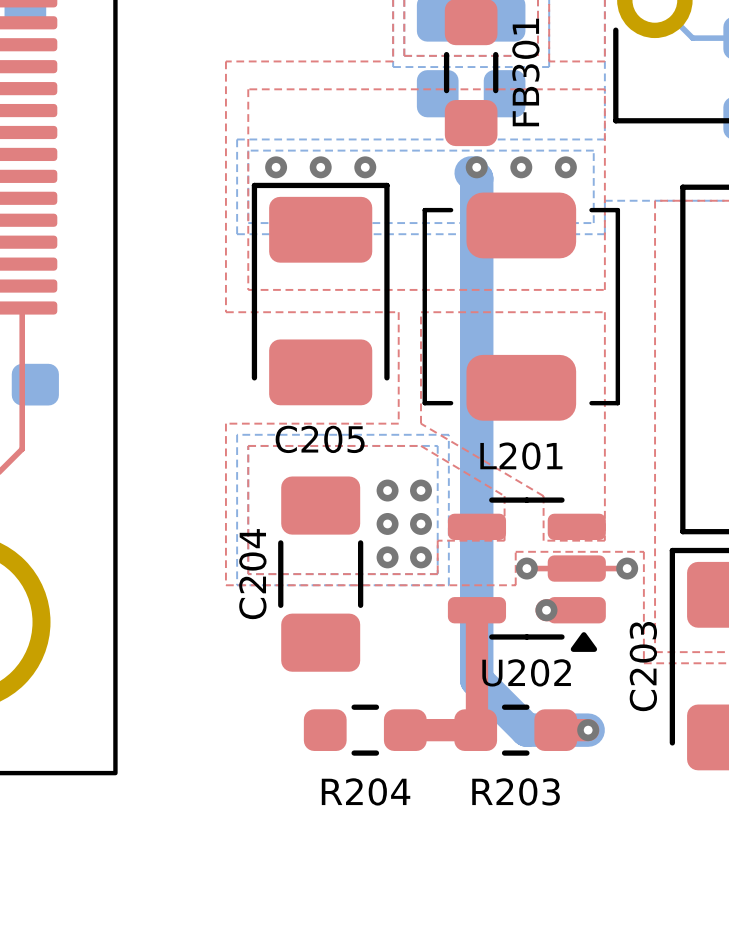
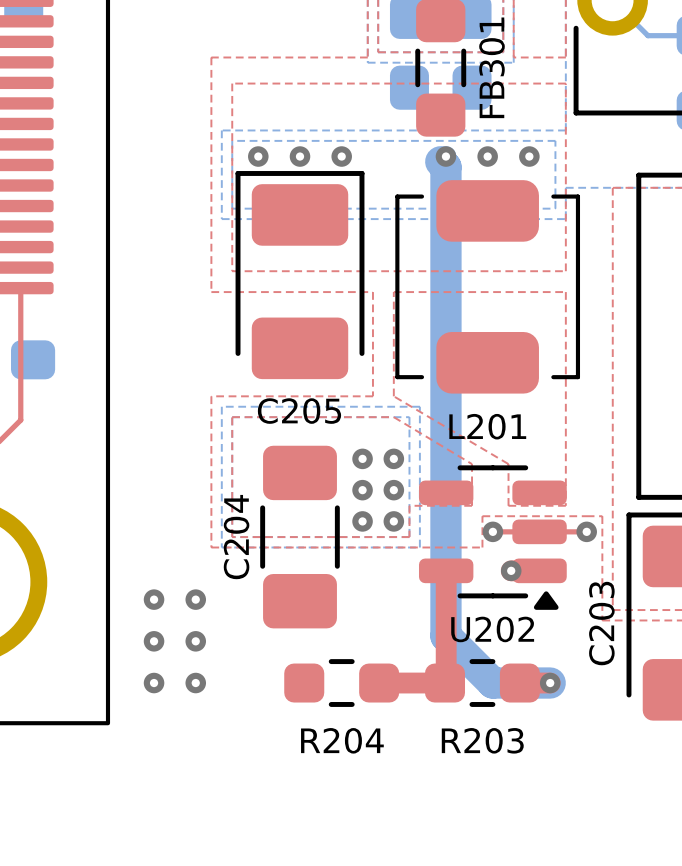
via: none -> (154, 599)
via: none -> (195, 599)
via: none -> (154, 641)
via: none -> (195, 641)
via: none -> (154, 683)
via: none -> (195, 683)

